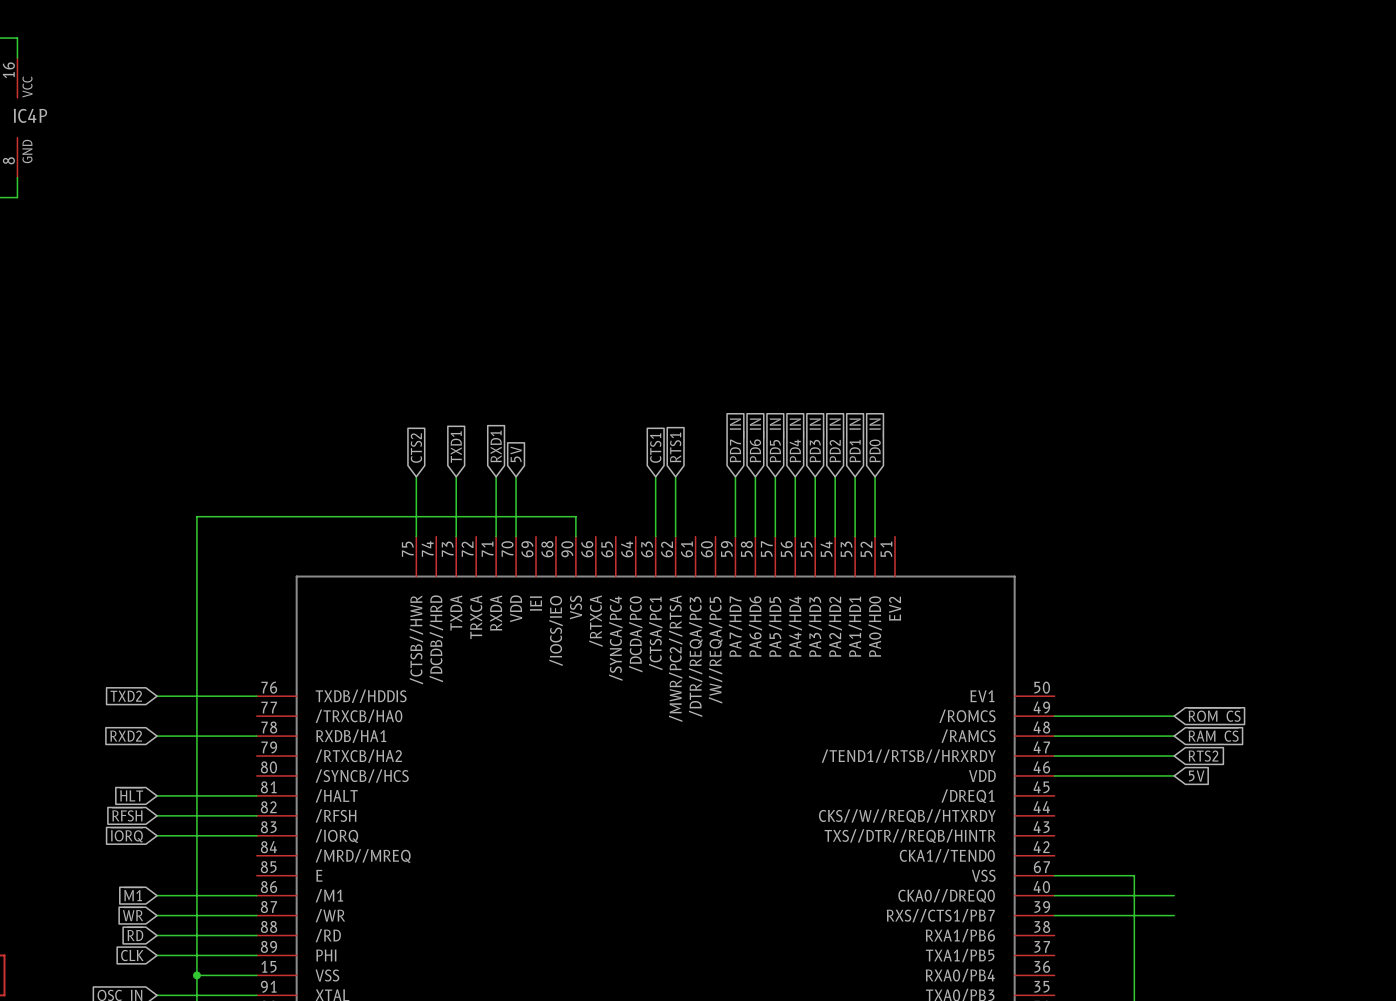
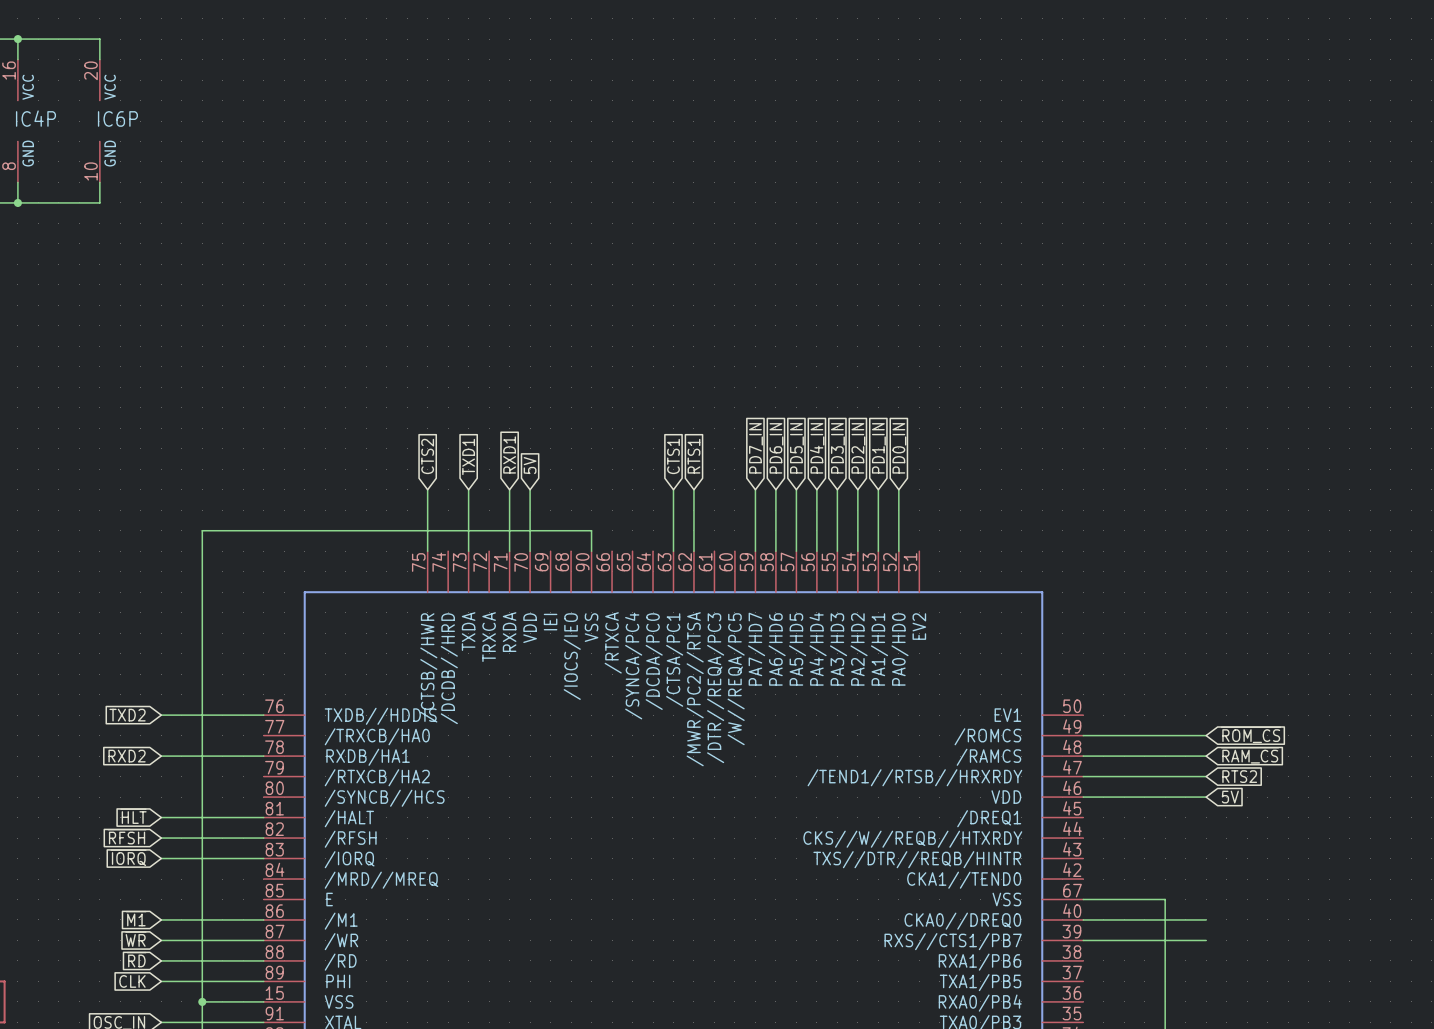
wire: none -> (17, 39) (99, 39) (99, 59)
junction: none -> (17, 39)
IC6P: none -> (99, 121)
wire: none -> (99, 182) (99, 202) (17, 202)
junction: none -> (17, 202)

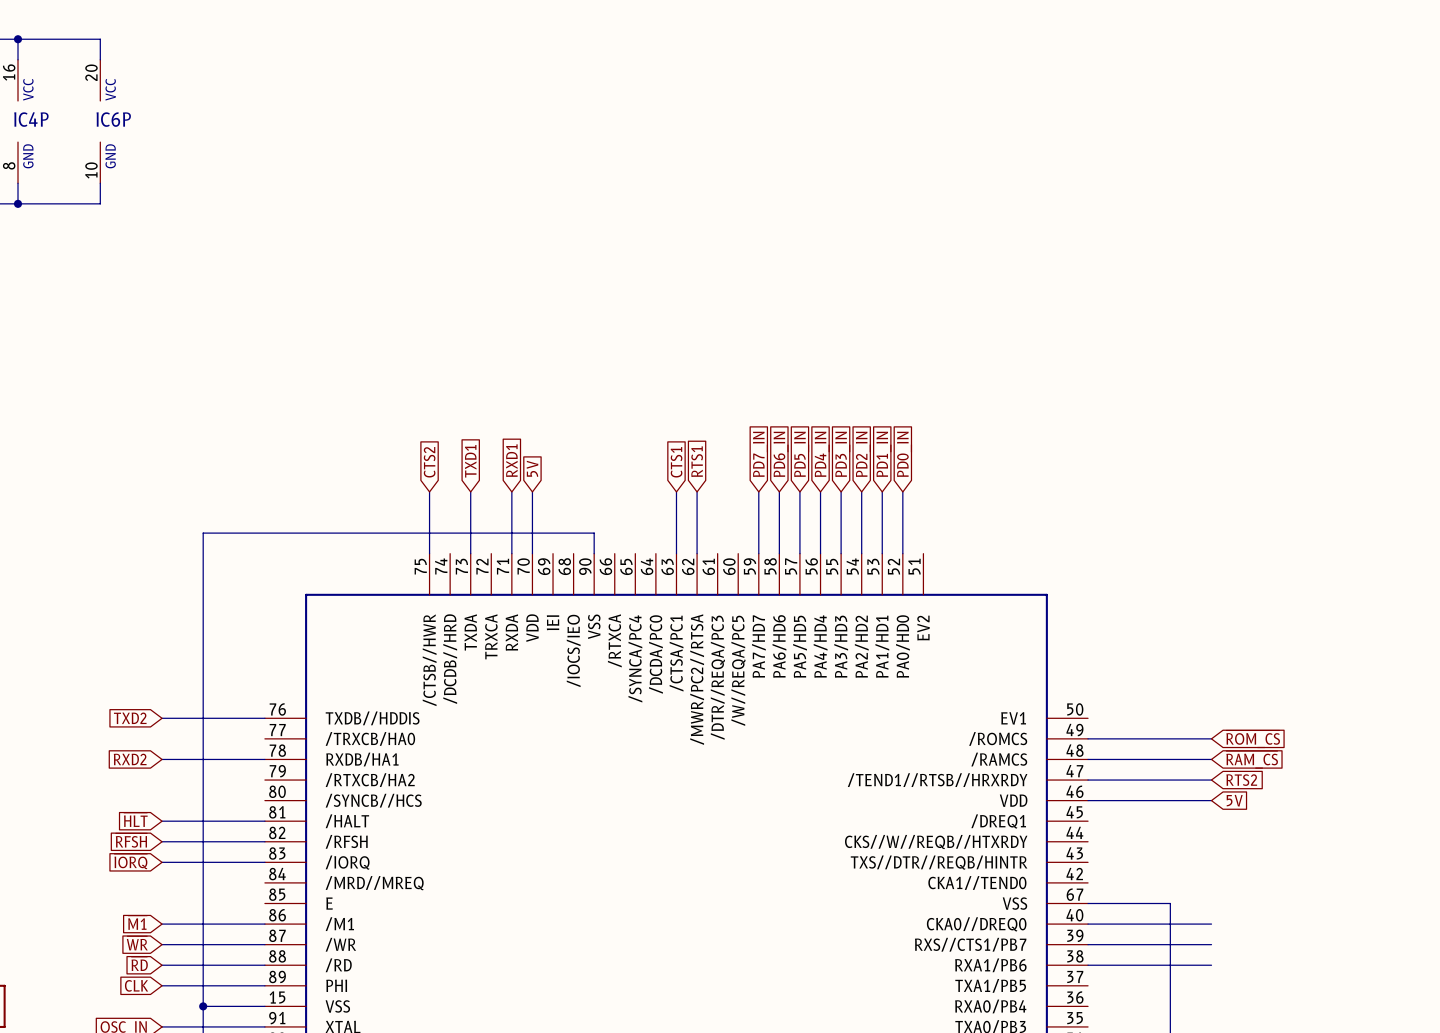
wire: none -> (1088, 965) (1211, 965)

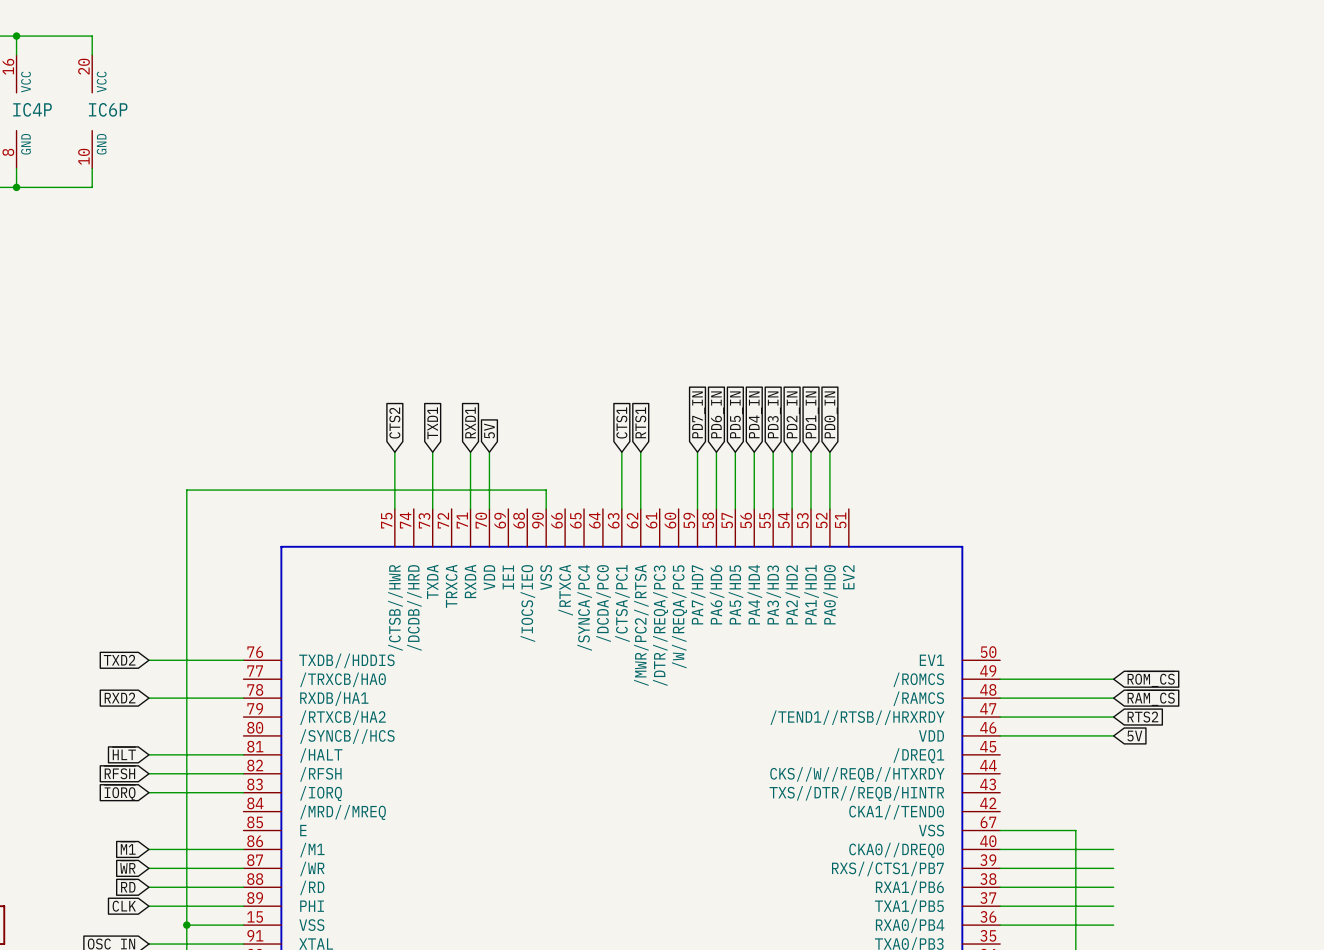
wire: none -> (1000, 906) (1113, 906)
wire: none -> (1000, 925) (1113, 925)

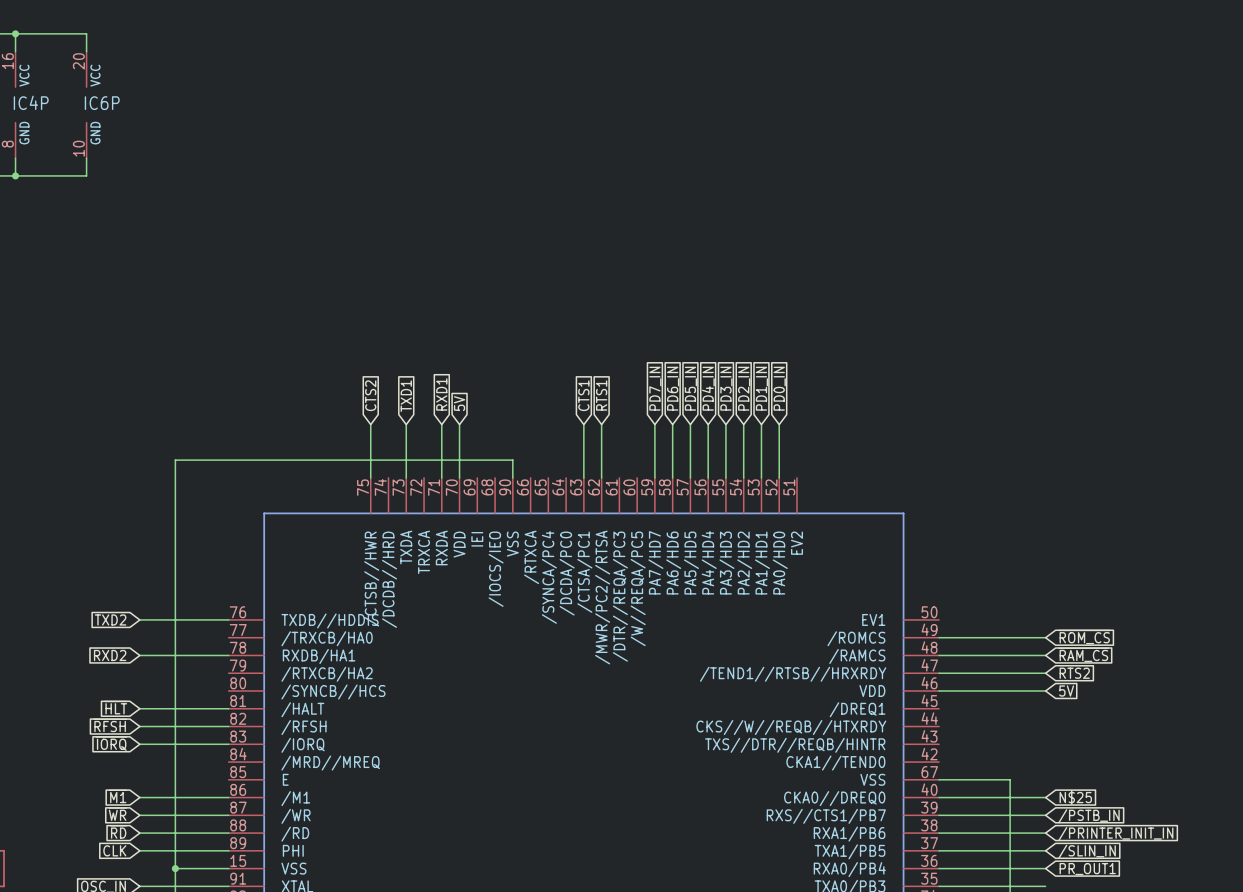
global label: none -> N$25 (1075, 797)
global label: none -> /PSTB_IN (1089, 816)
global label: none -> /PRINTER_INIT_IN (1115, 834)
global label: none -> /SLIN_IN (1087, 851)
global label: none -> PR_OUT1 (1087, 869)
wire: none -> (939, 886) (1045, 886)

